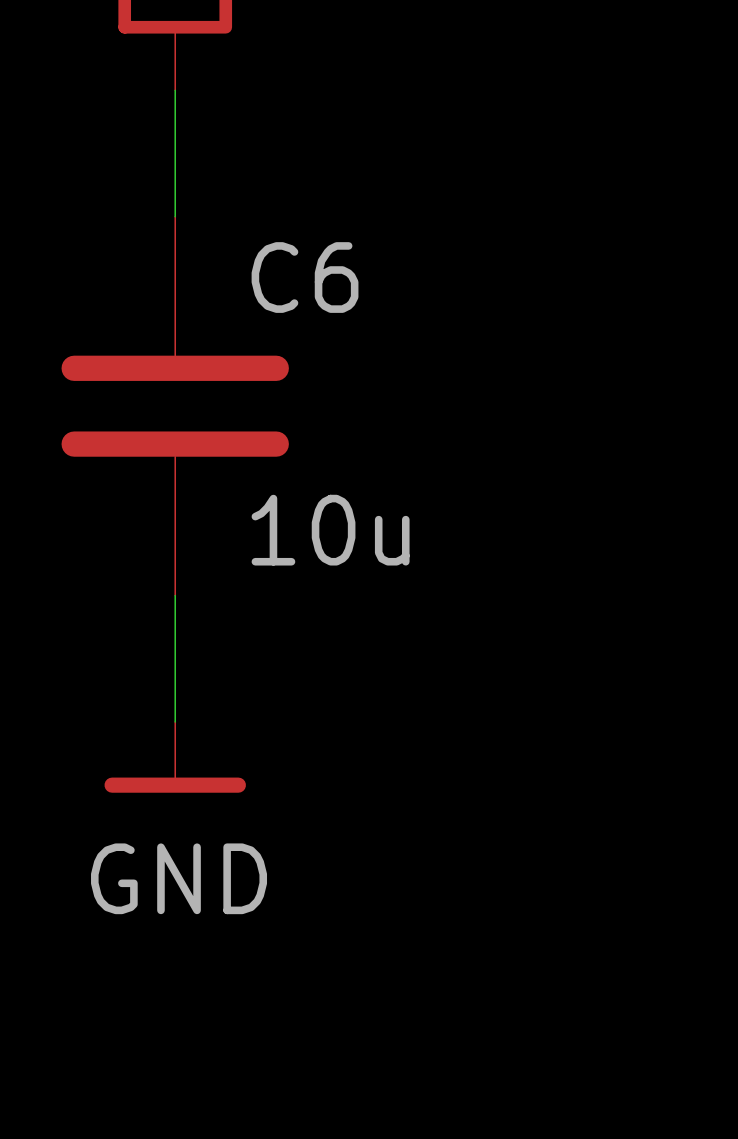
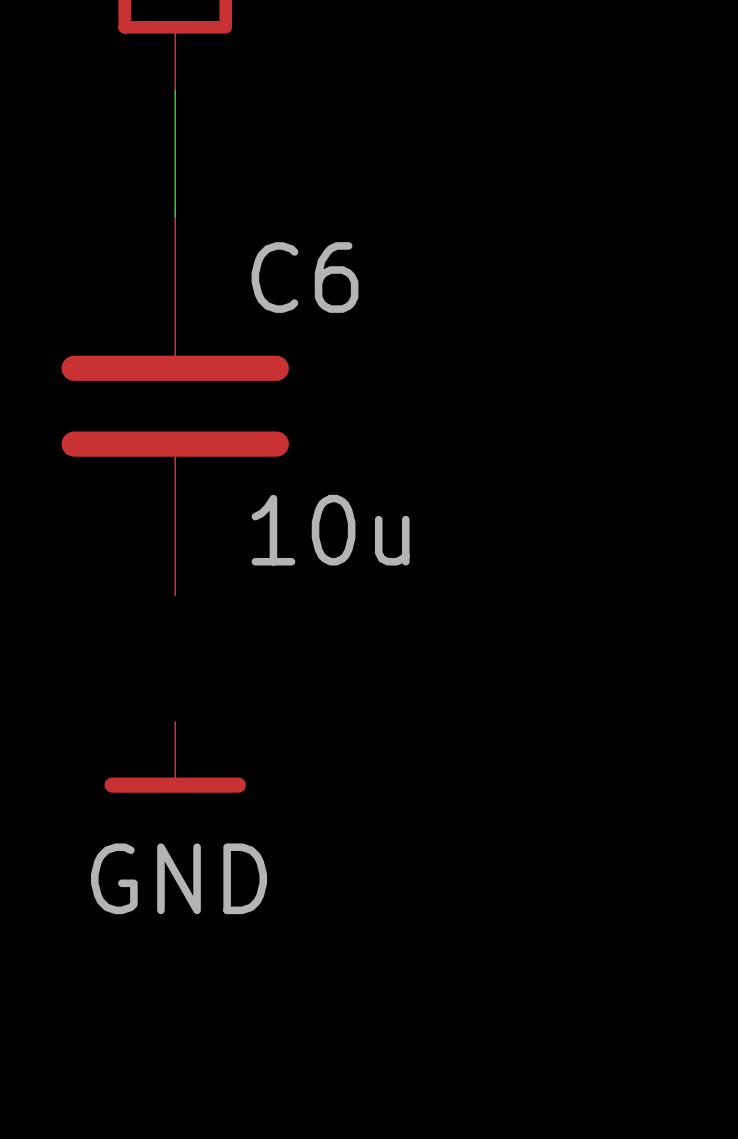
wire: (175, 595) (175, 721) -> none

